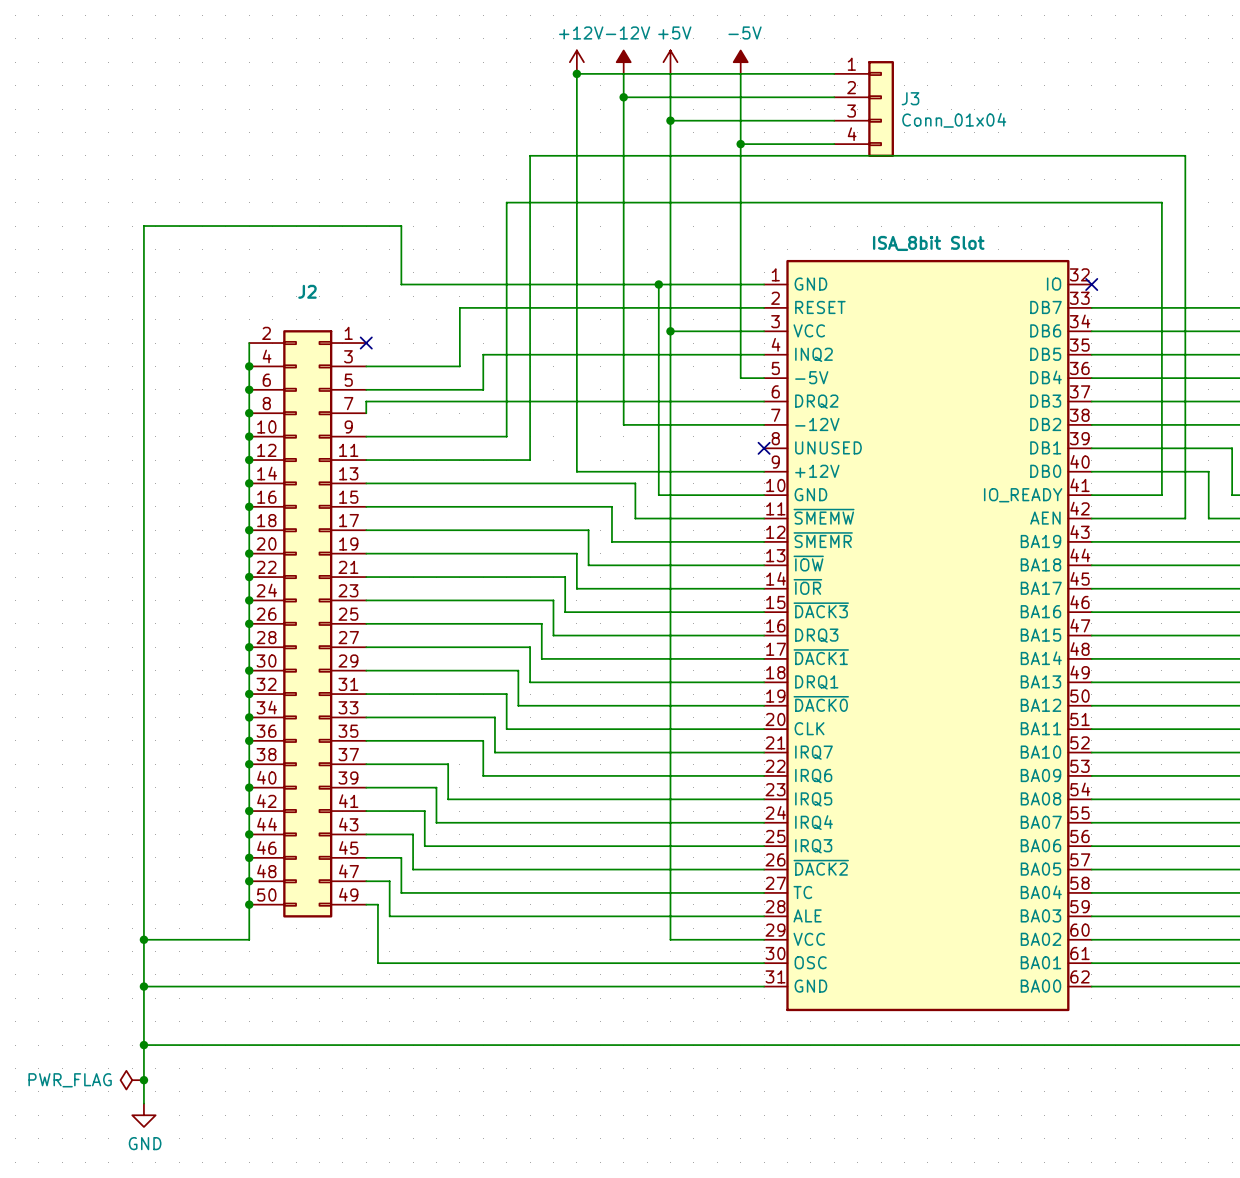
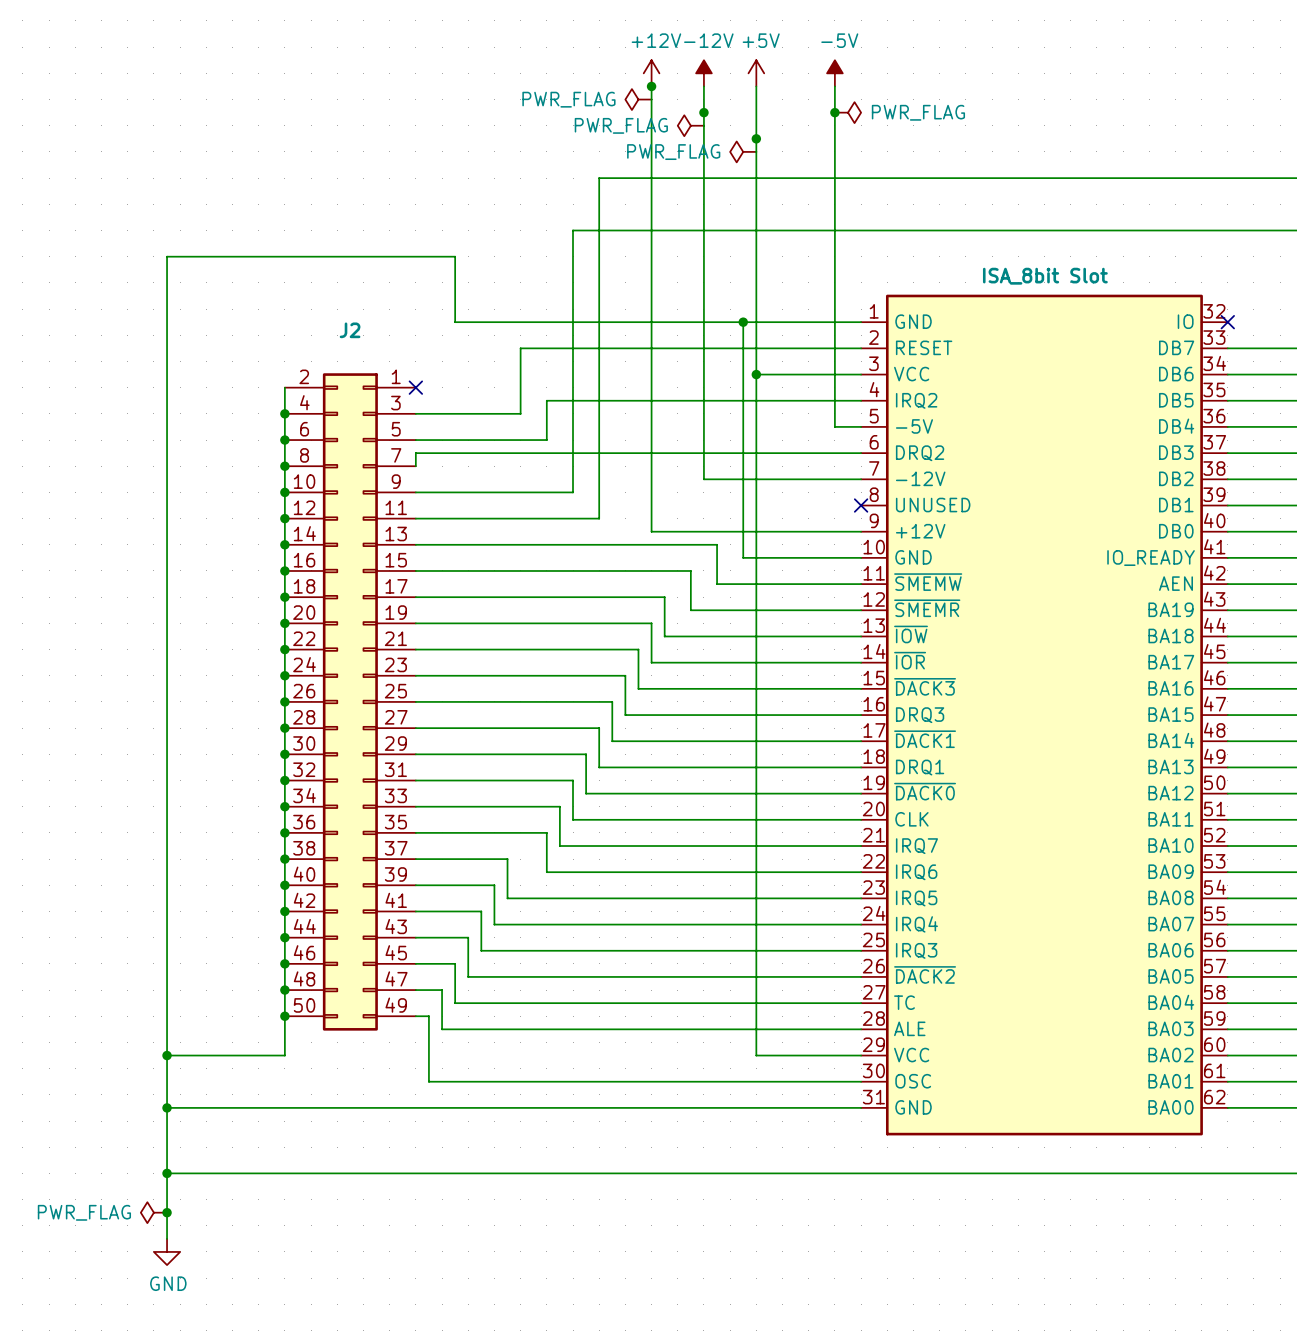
wire: (576, 73) (834, 73) -> none
power symbol: none -> PWR_FLAG (638, 99)
wire: (623, 97) (834, 97) -> none
power symbol: none -> PWR_FLAG (848, 112)
power symbol: none -> PWR_FLAG (690, 125)
J3: Conn_01x04 (864, 109) -> none
wire: (670, 120) (834, 120) -> none
power symbol: none -> PWR_FLAG (743, 151)
wire: (740, 144) (834, 144) -> none
junction position: (740, 144) -> (834, 112)
part pin name: INQ2 (813, 354) -> IRQ2 (916, 400)

